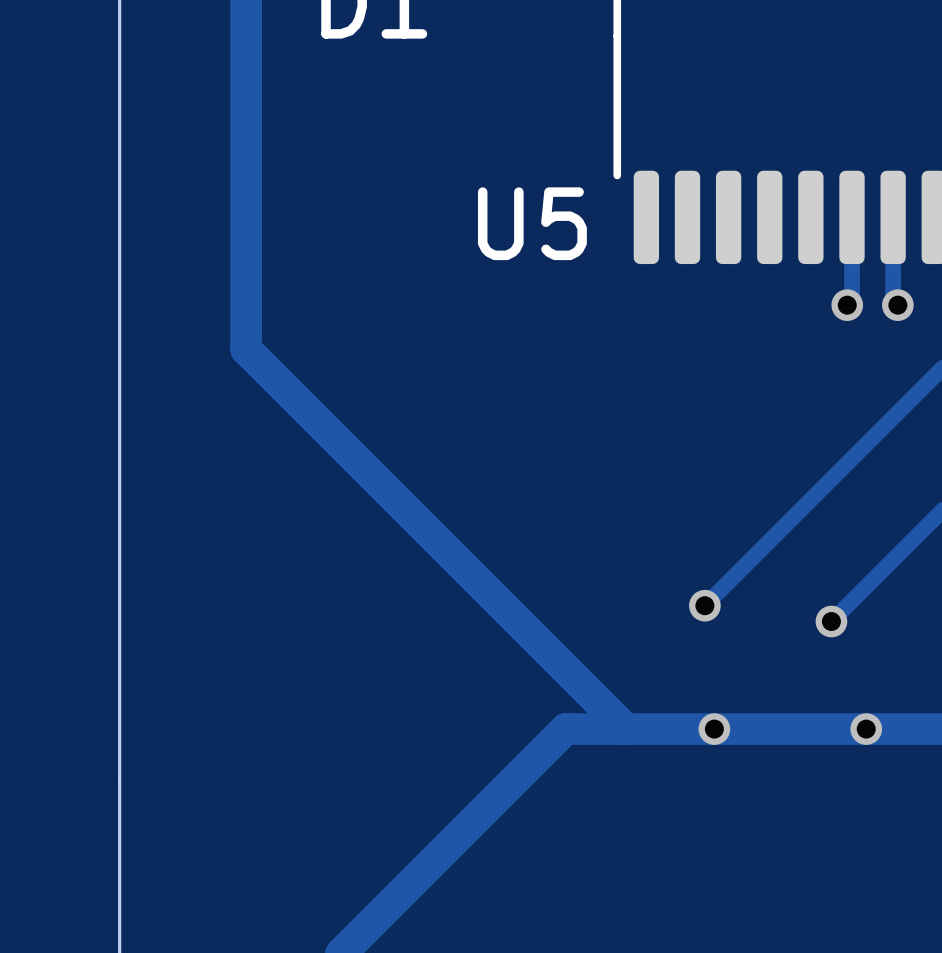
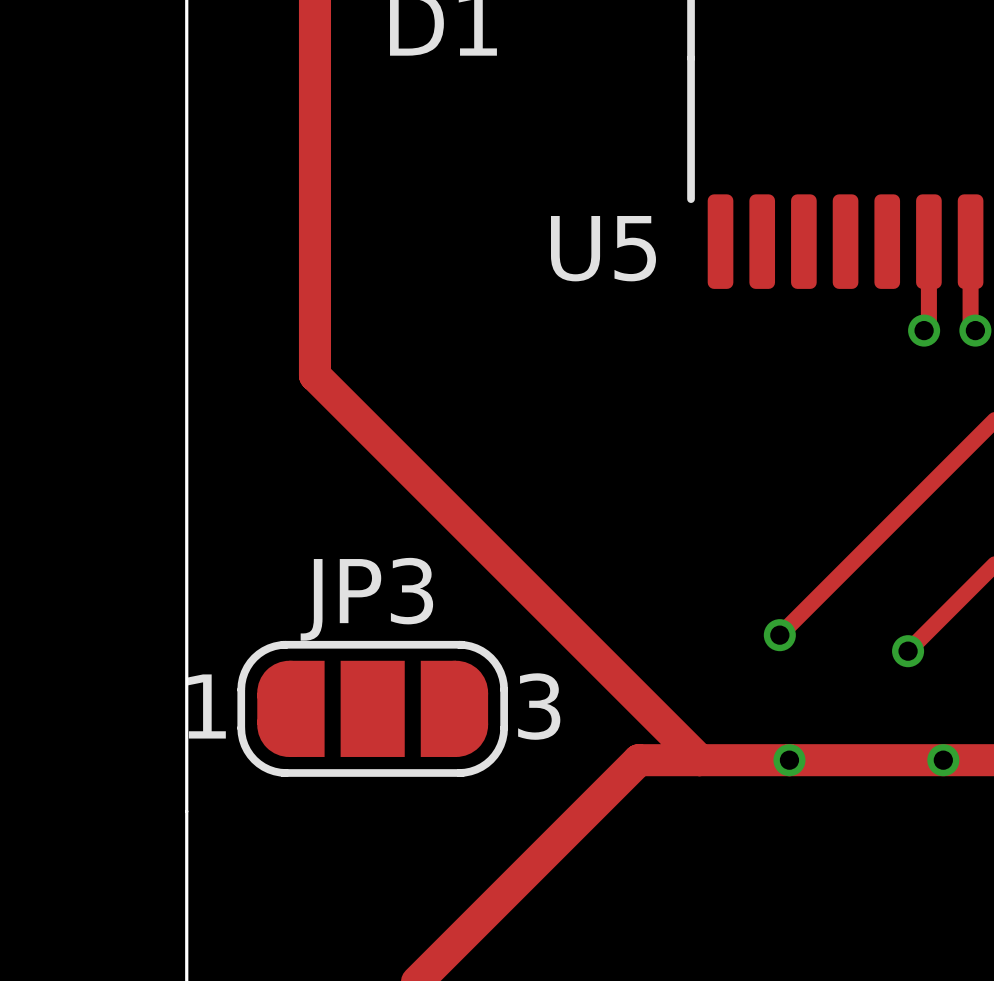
JP3: none -> (372, 708)

